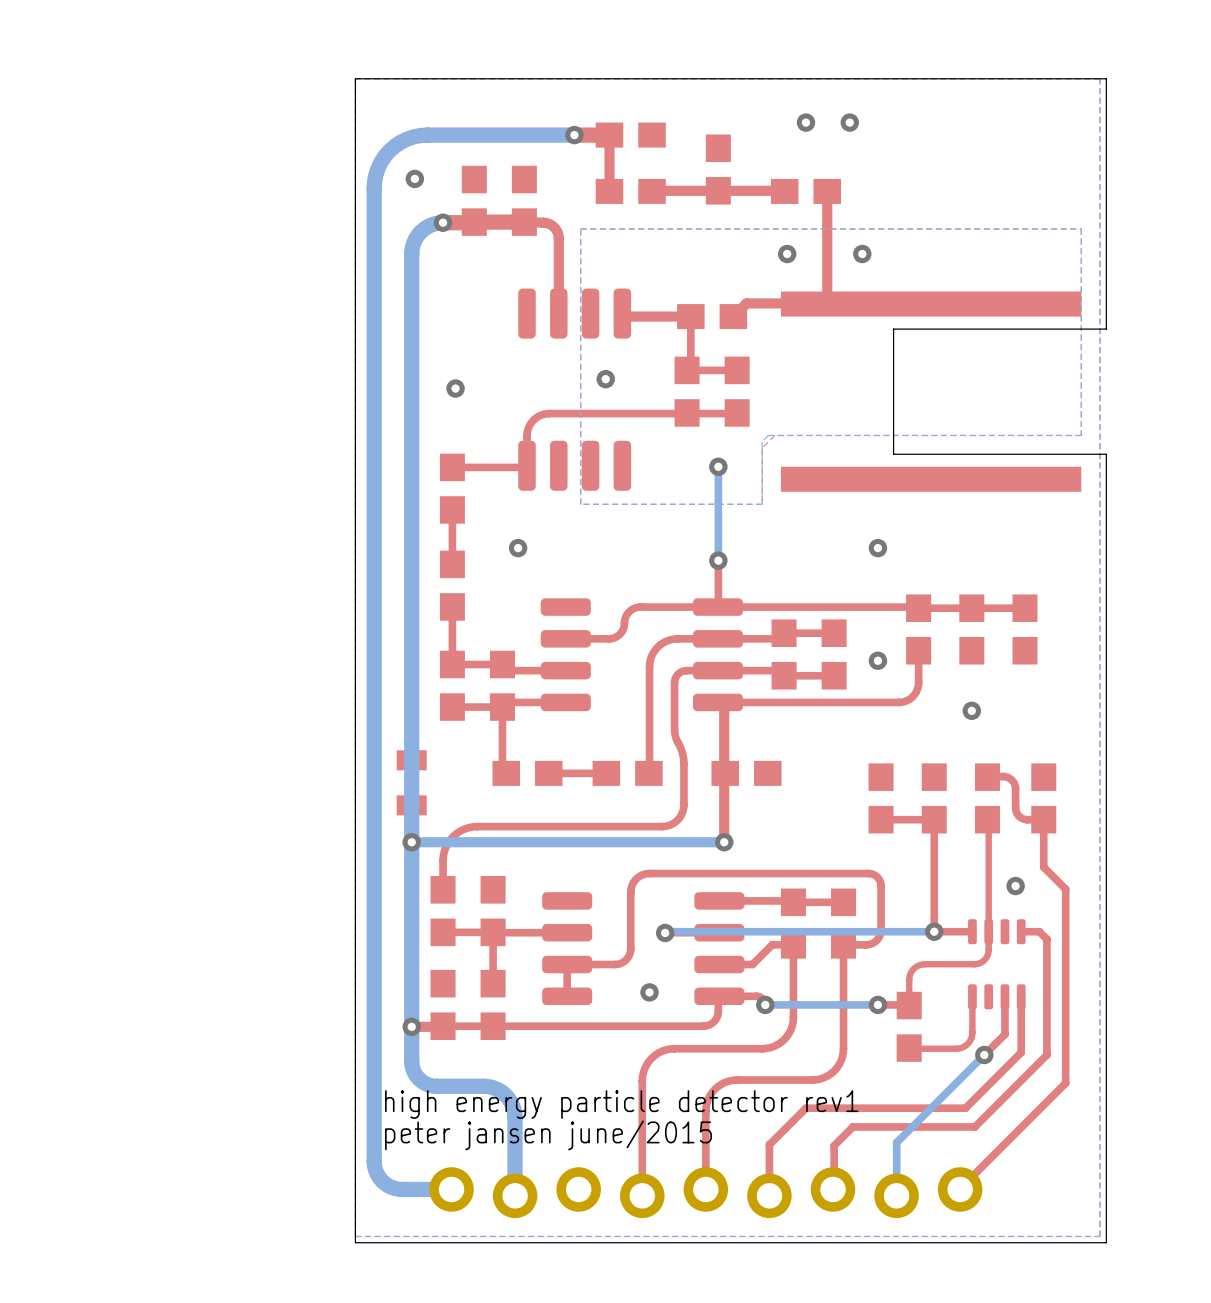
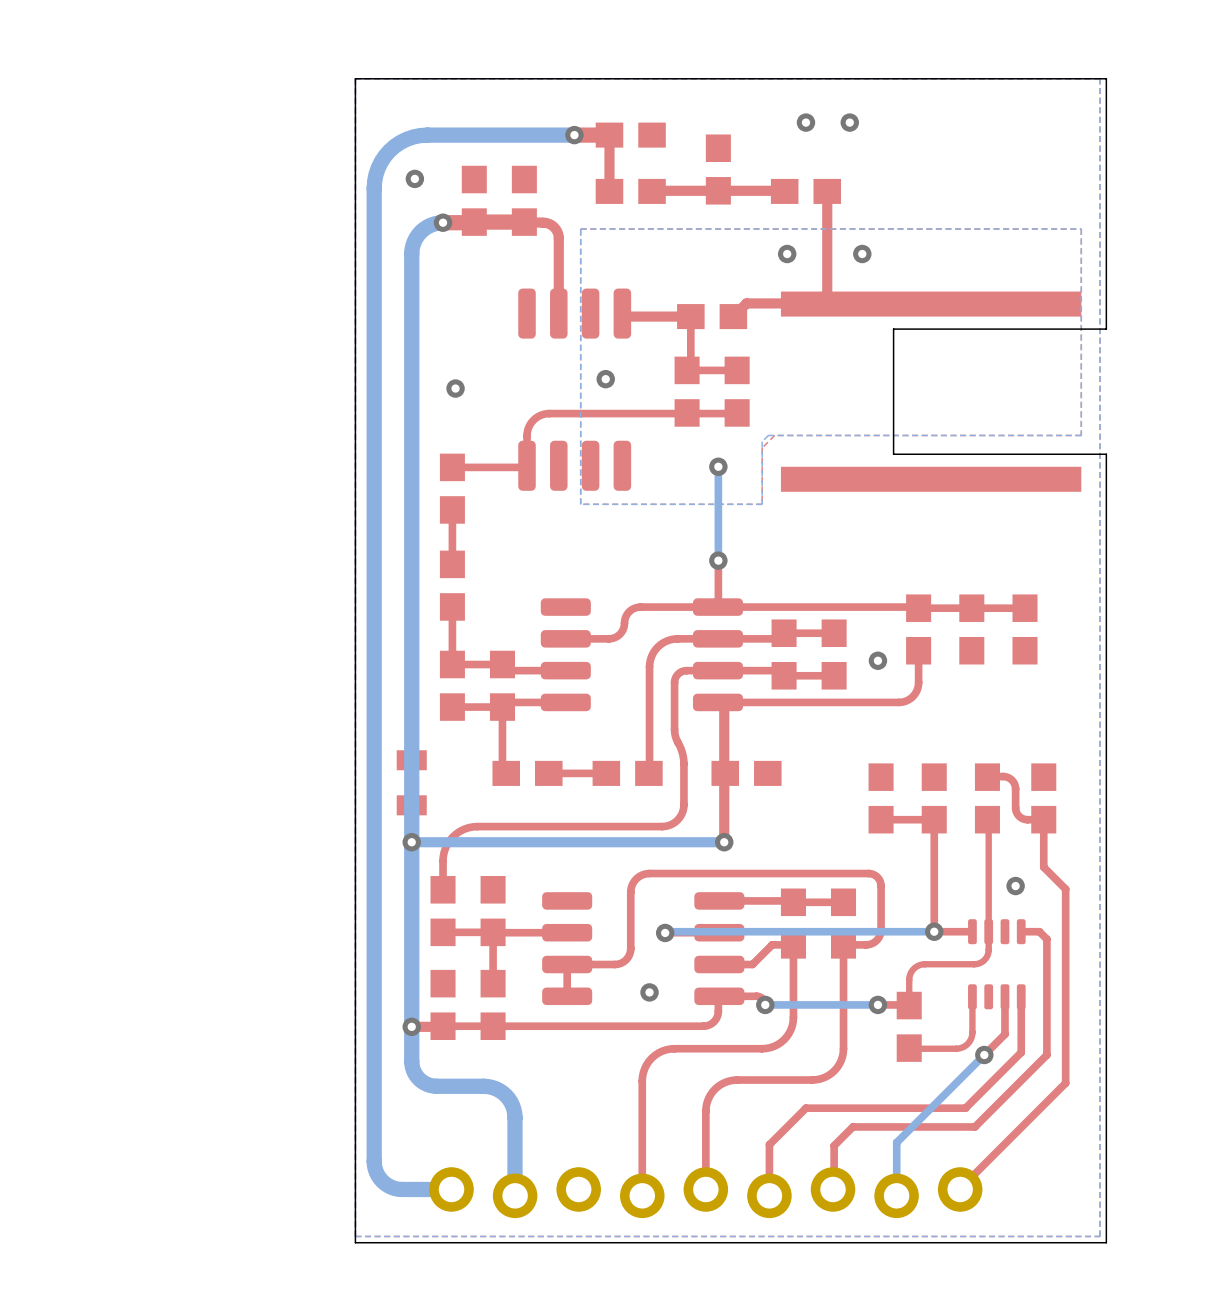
via: (518, 548) -> none
via: (877, 548) -> none
via: (971, 710) -> none
text: high energy particle detector rev1 (621, 1104) -> none
text: peter jansen june/2015 (548, 1135) -> none

